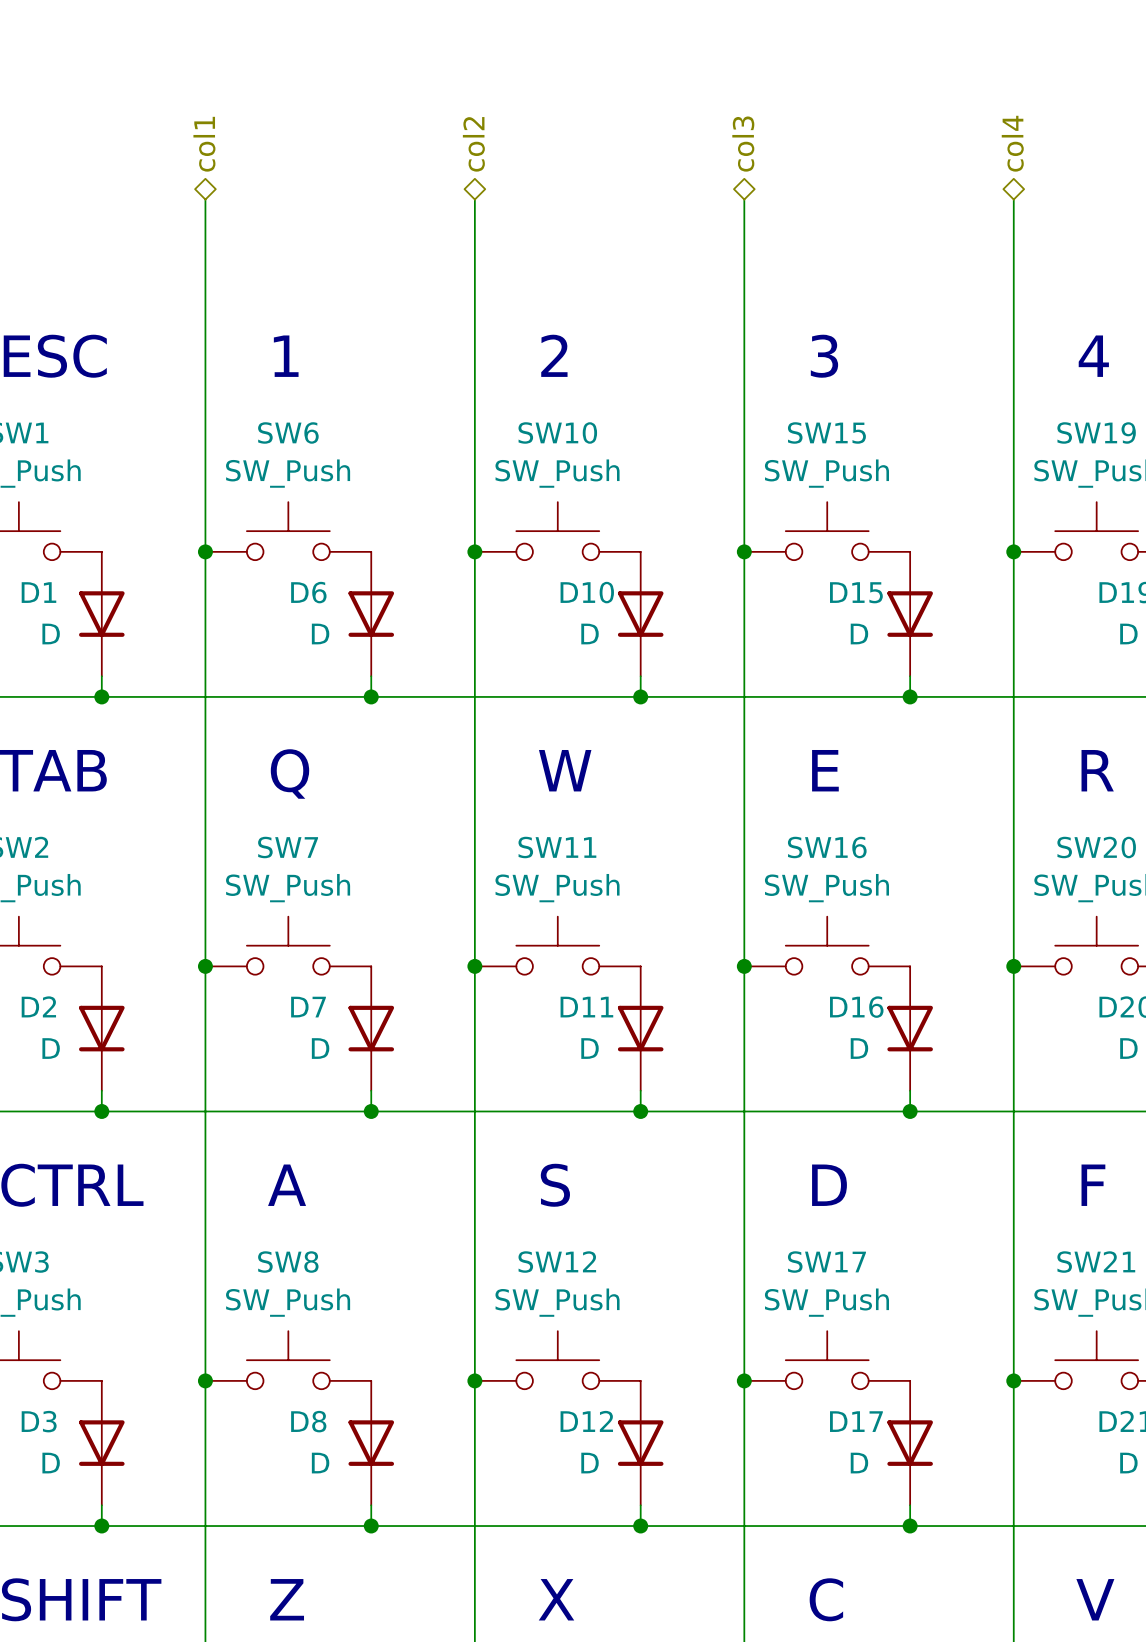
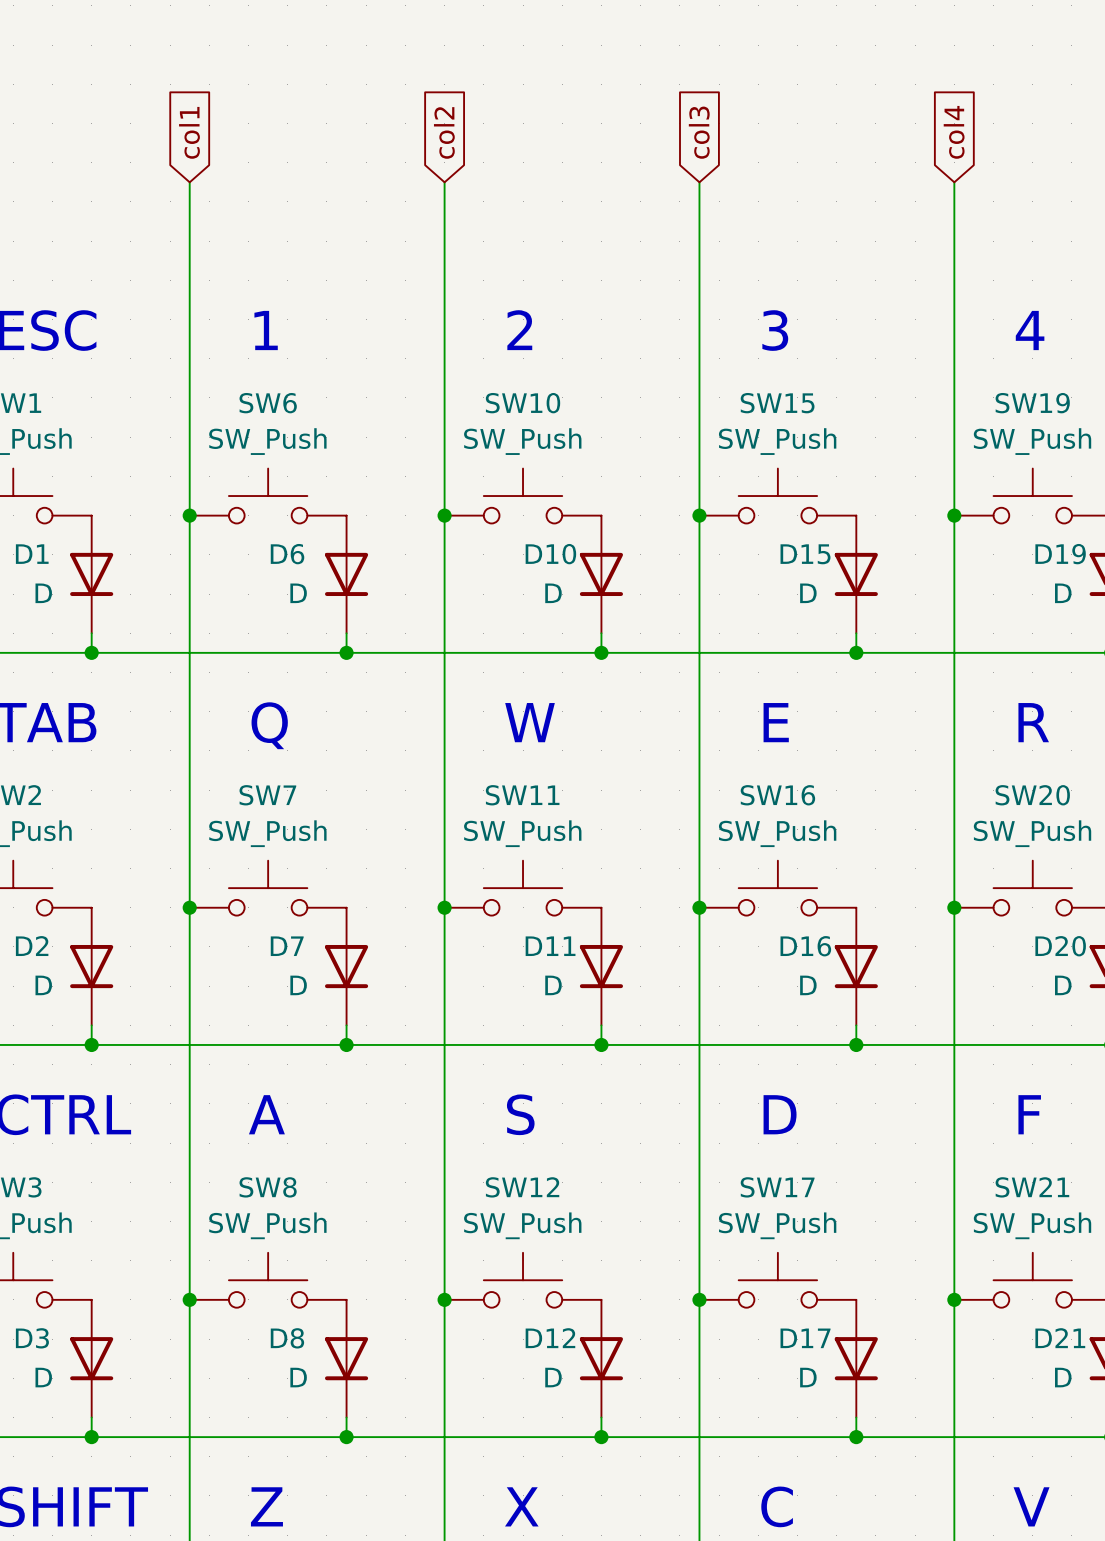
hierarchical label: col4 (1012, 143) -> none
hierarchical label: col1 (204, 144) -> none
hierarchical label: col2 (473, 144) -> none
hierarchical label: col3 (743, 144) -> none
global label: none -> col4 (954, 132)
global label: none -> col1 (189, 132)
global label: none -> col2 (444, 132)
global label: none -> col3 (699, 132)

